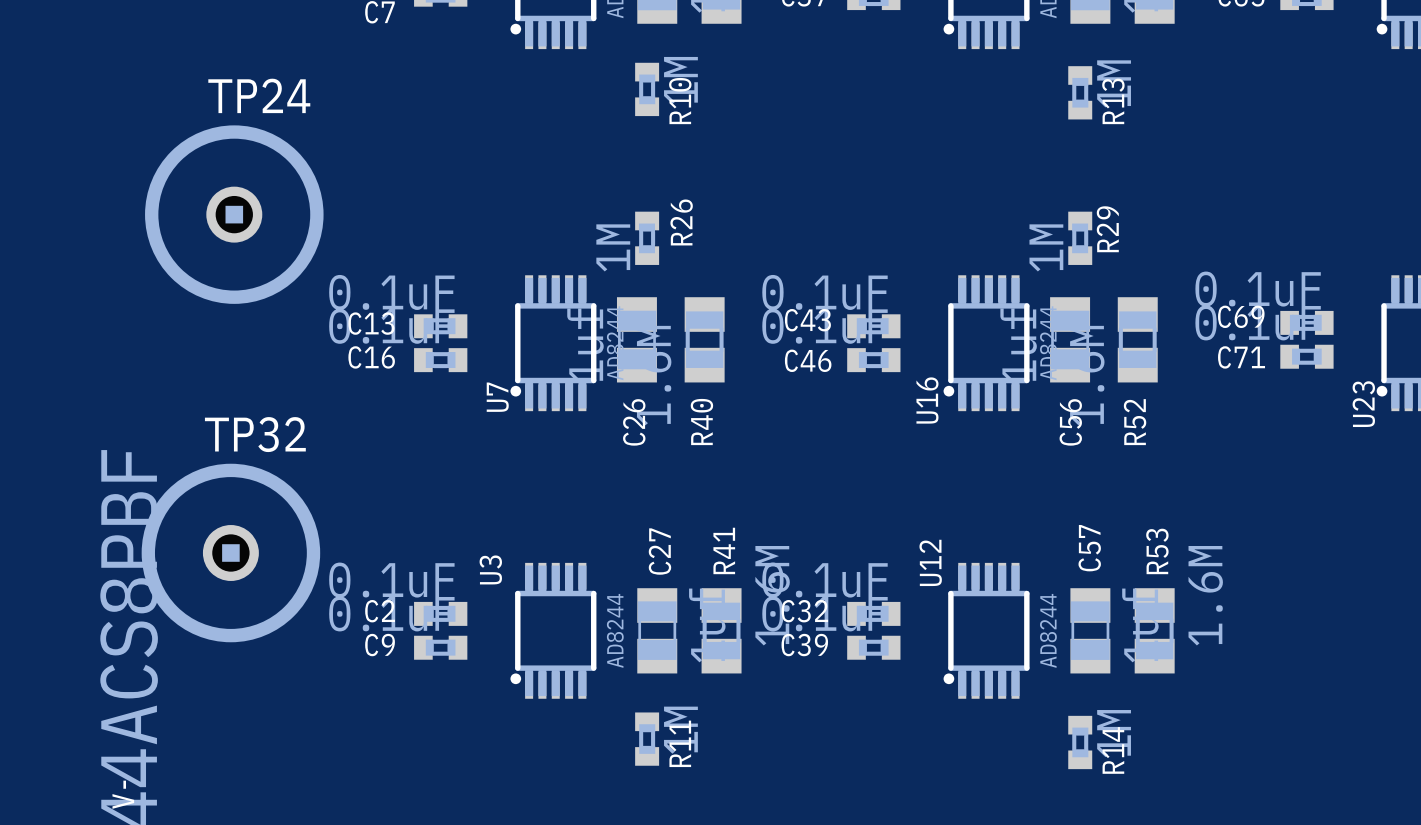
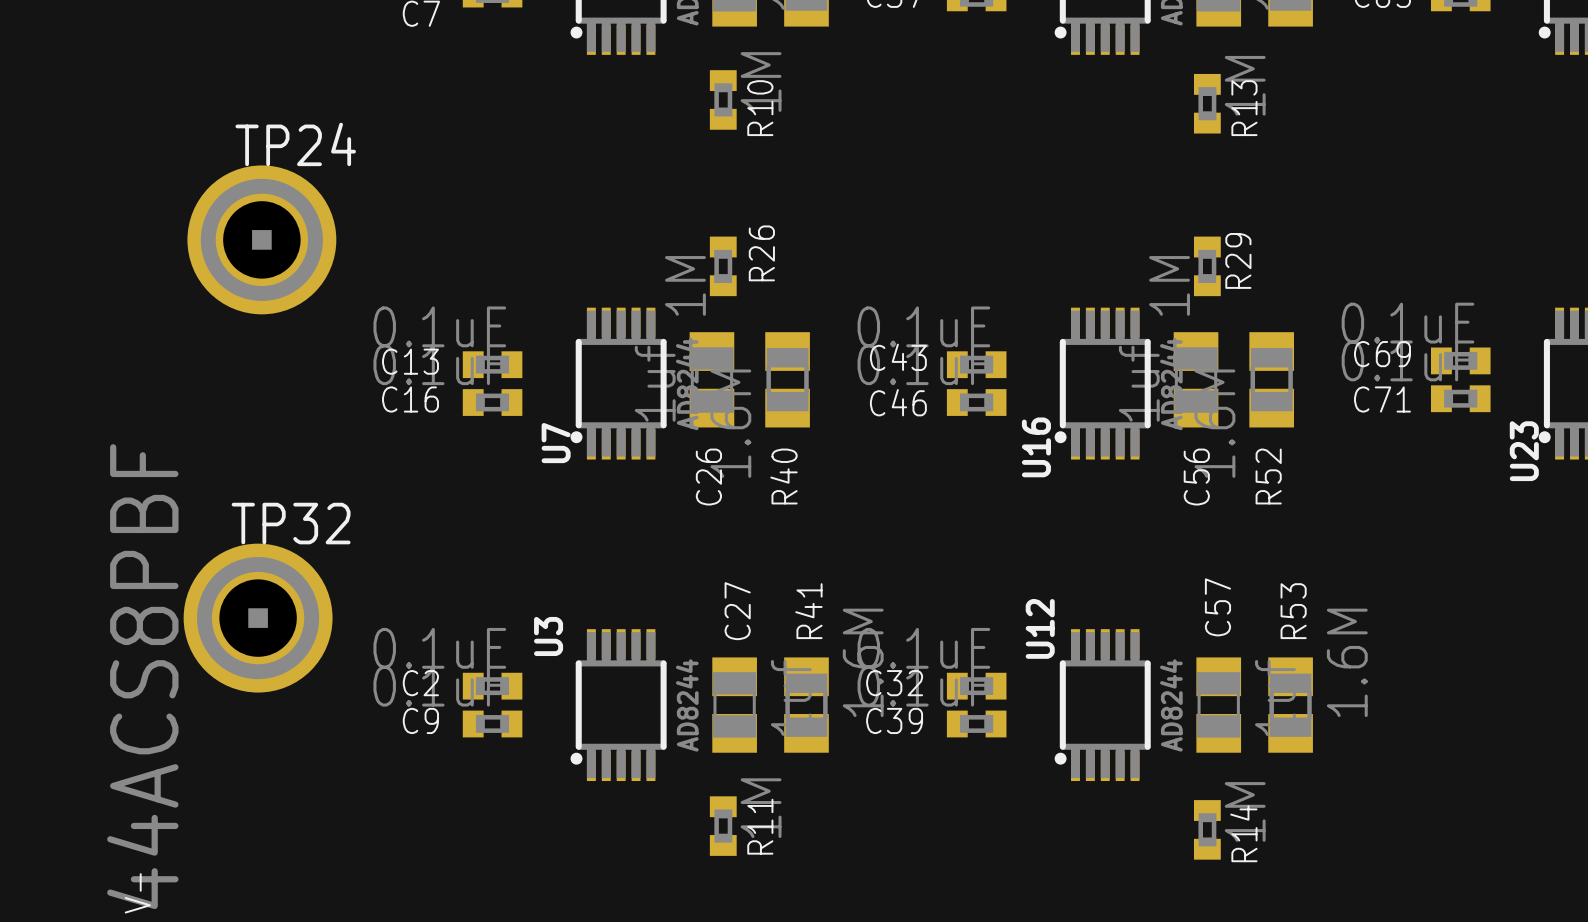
TP24 footprint: [145, 125, 324, 304] -> [187, 165, 337, 315]
TP32 footprint: [141, 463, 321, 643] -> [183, 543, 333, 693]

